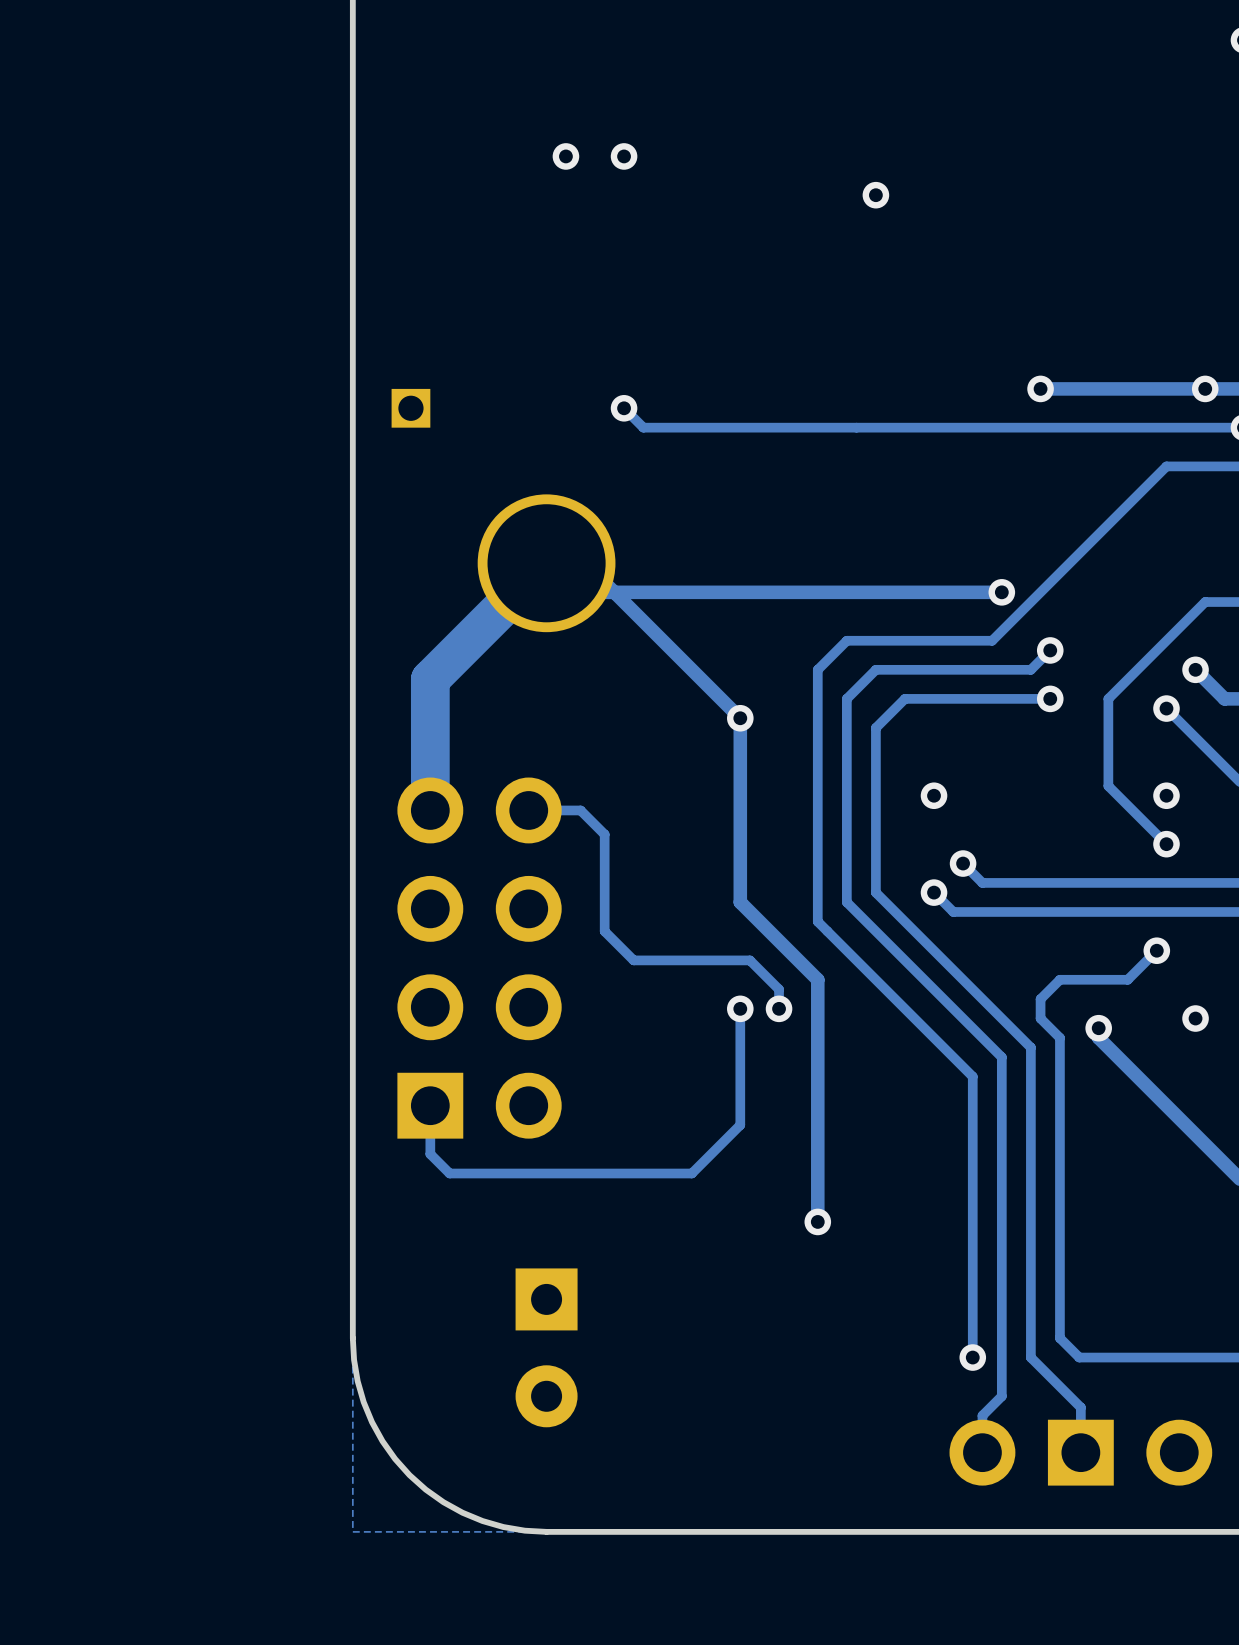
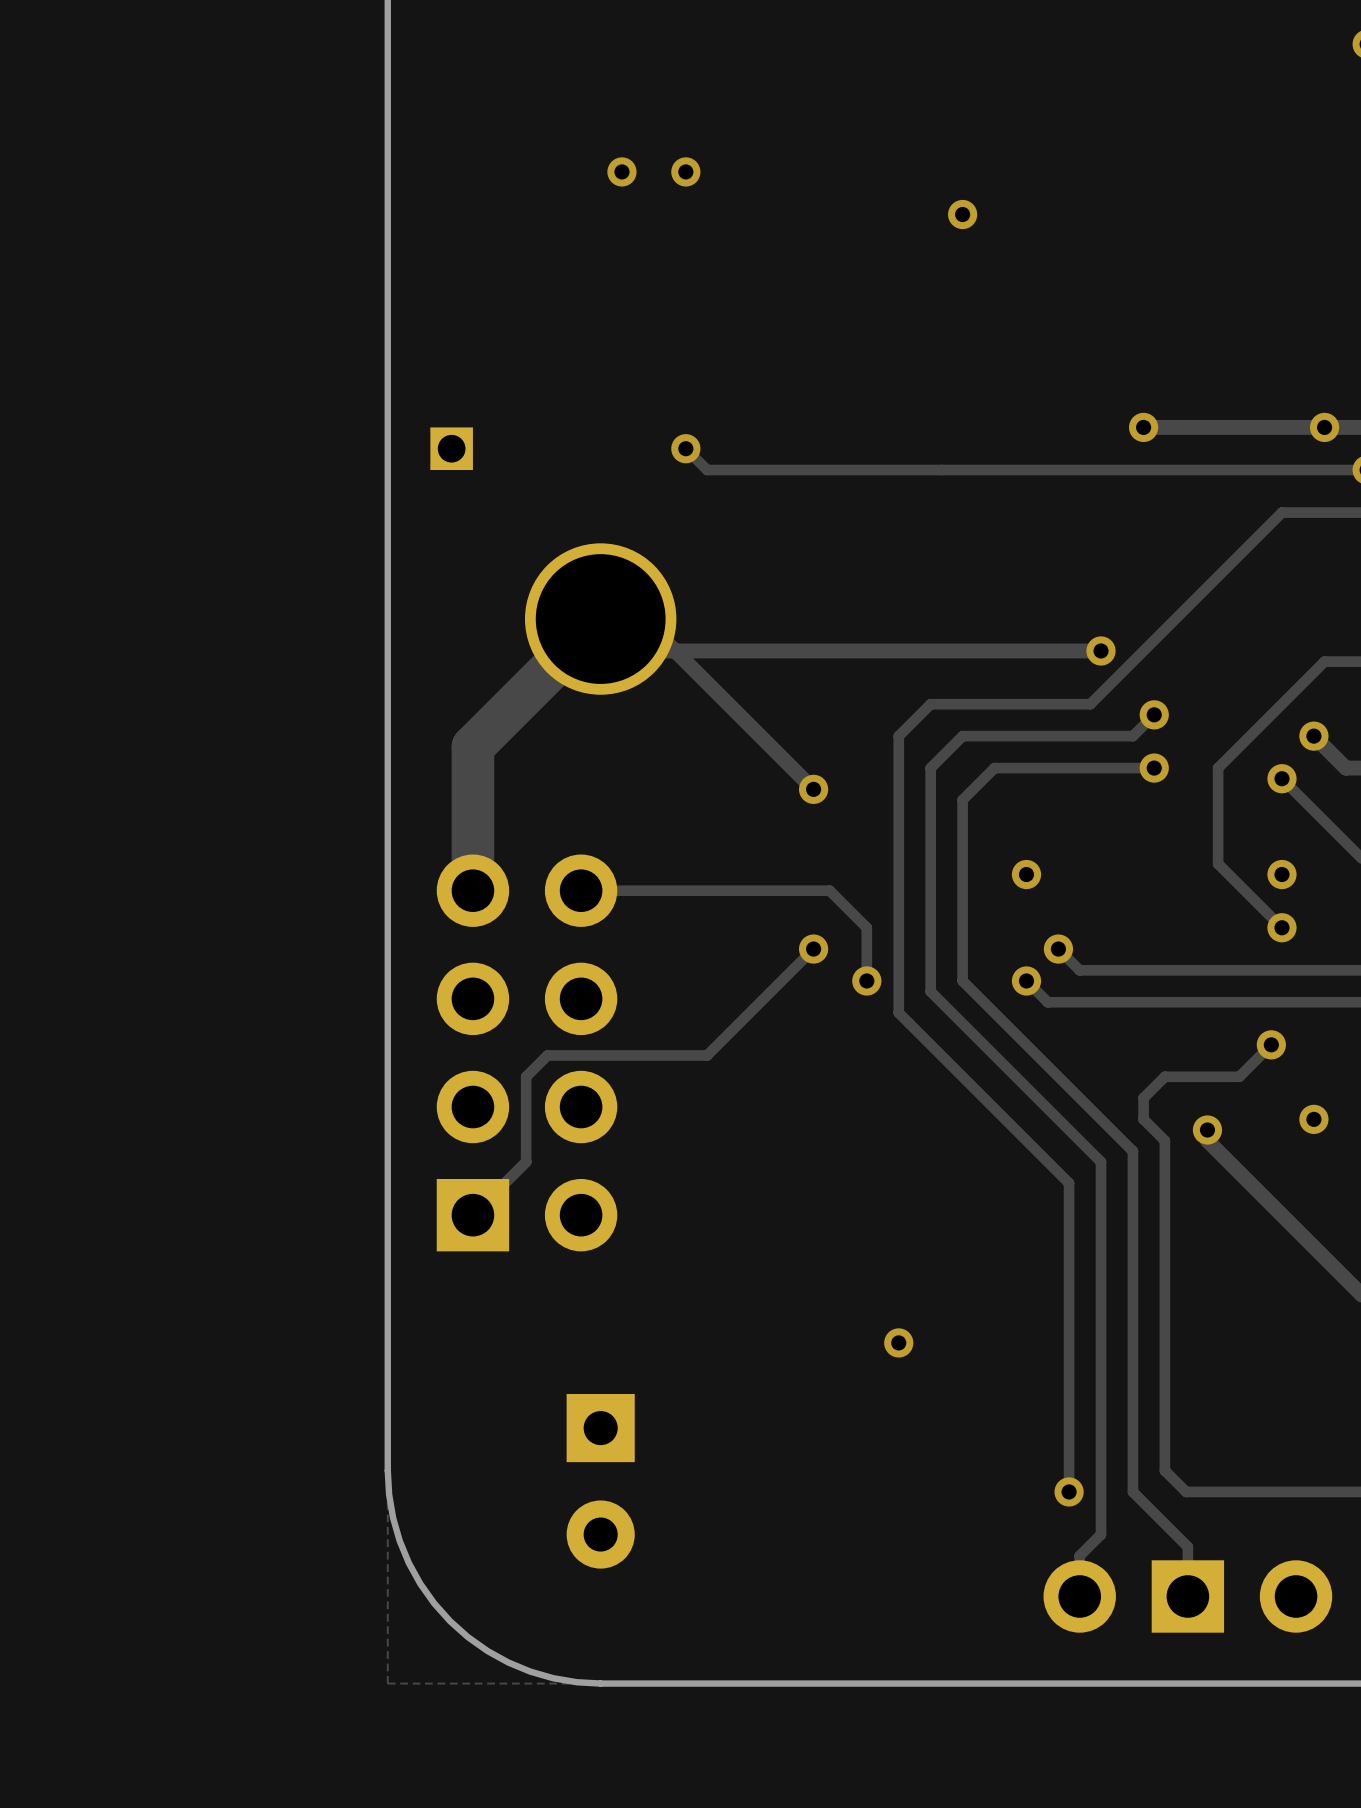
track: (740, 718) (740, 902) (817, 979) (817, 1221) -> none
track: (580, 810) (604, 834) (604, 931) (633, 960) -> (638, 890) (829, 890) (866, 927) (866, 980)
via: none -> (813, 949)
via: none -> (866, 980)
track: (643, 960) (749, 960) (779, 989) (779, 1008) -> (707, 1055) (813, 949)
track: (740, 1008) (740, 1125) (691, 1173) (449, 1173) (430, 1154) (430, 1105) -> (696, 1055) (547, 1055) (526, 1076) (526, 1161) (472, 1215)
via: (740, 1008) -> none
via: (779, 1008) -> none

